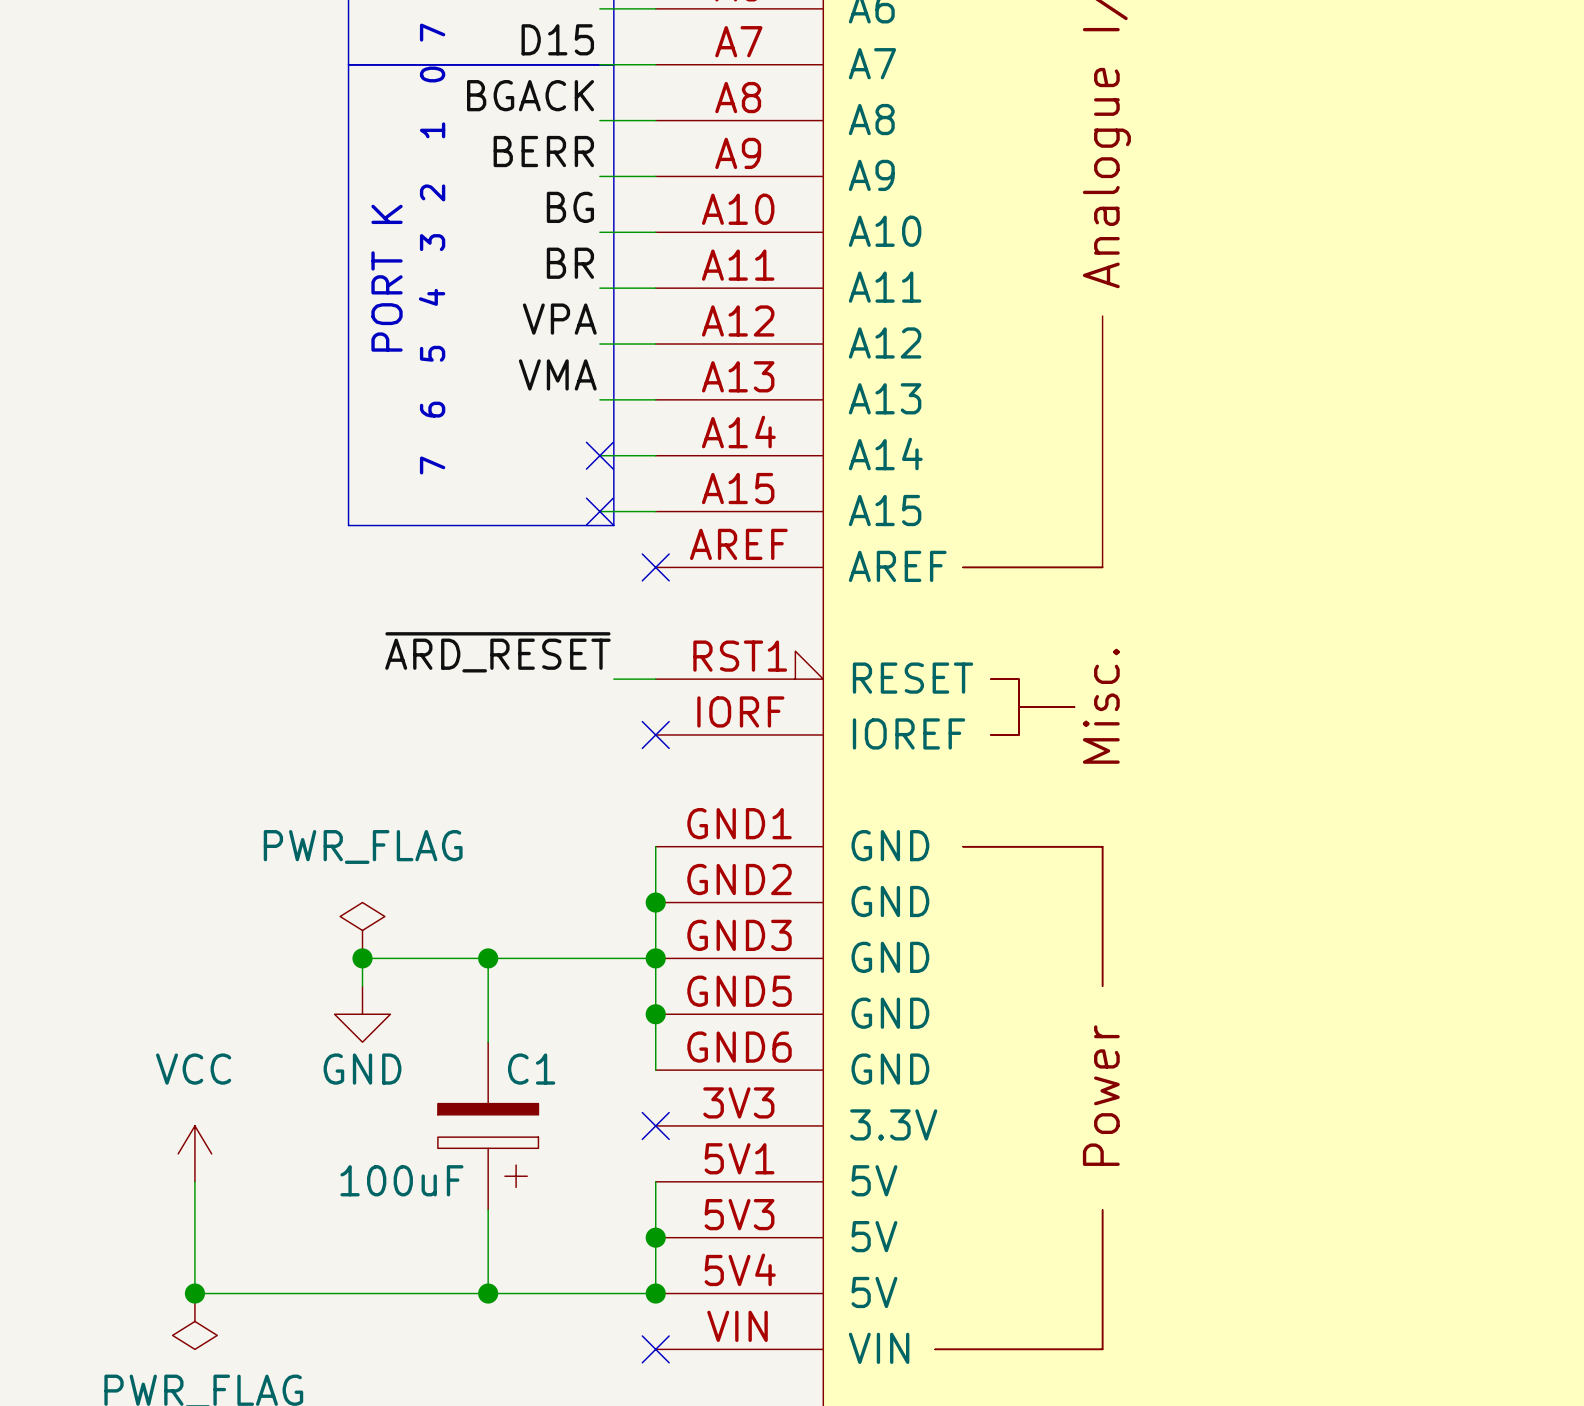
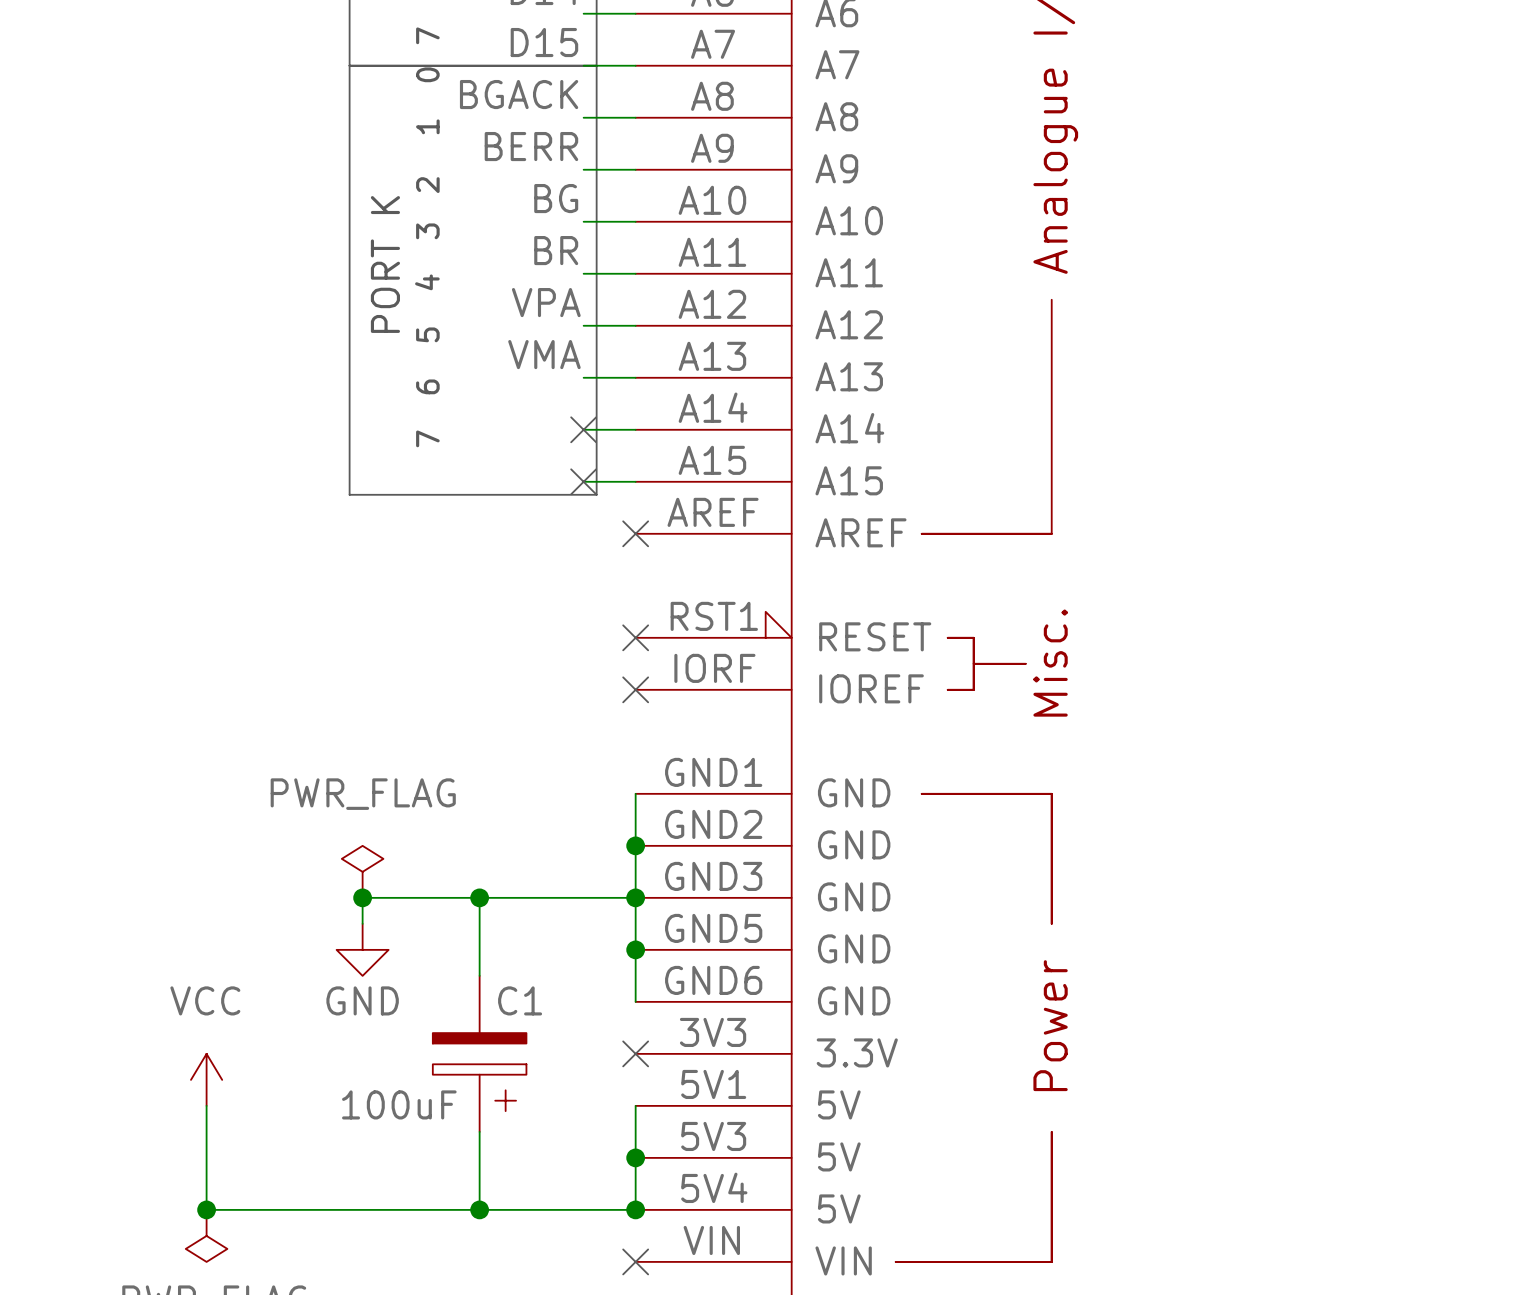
label: ~{ARD_RESET} (497, 652) -> none
wire: (613, 679) (655, 679) -> none
no-connect mark: none -> (635, 637)

